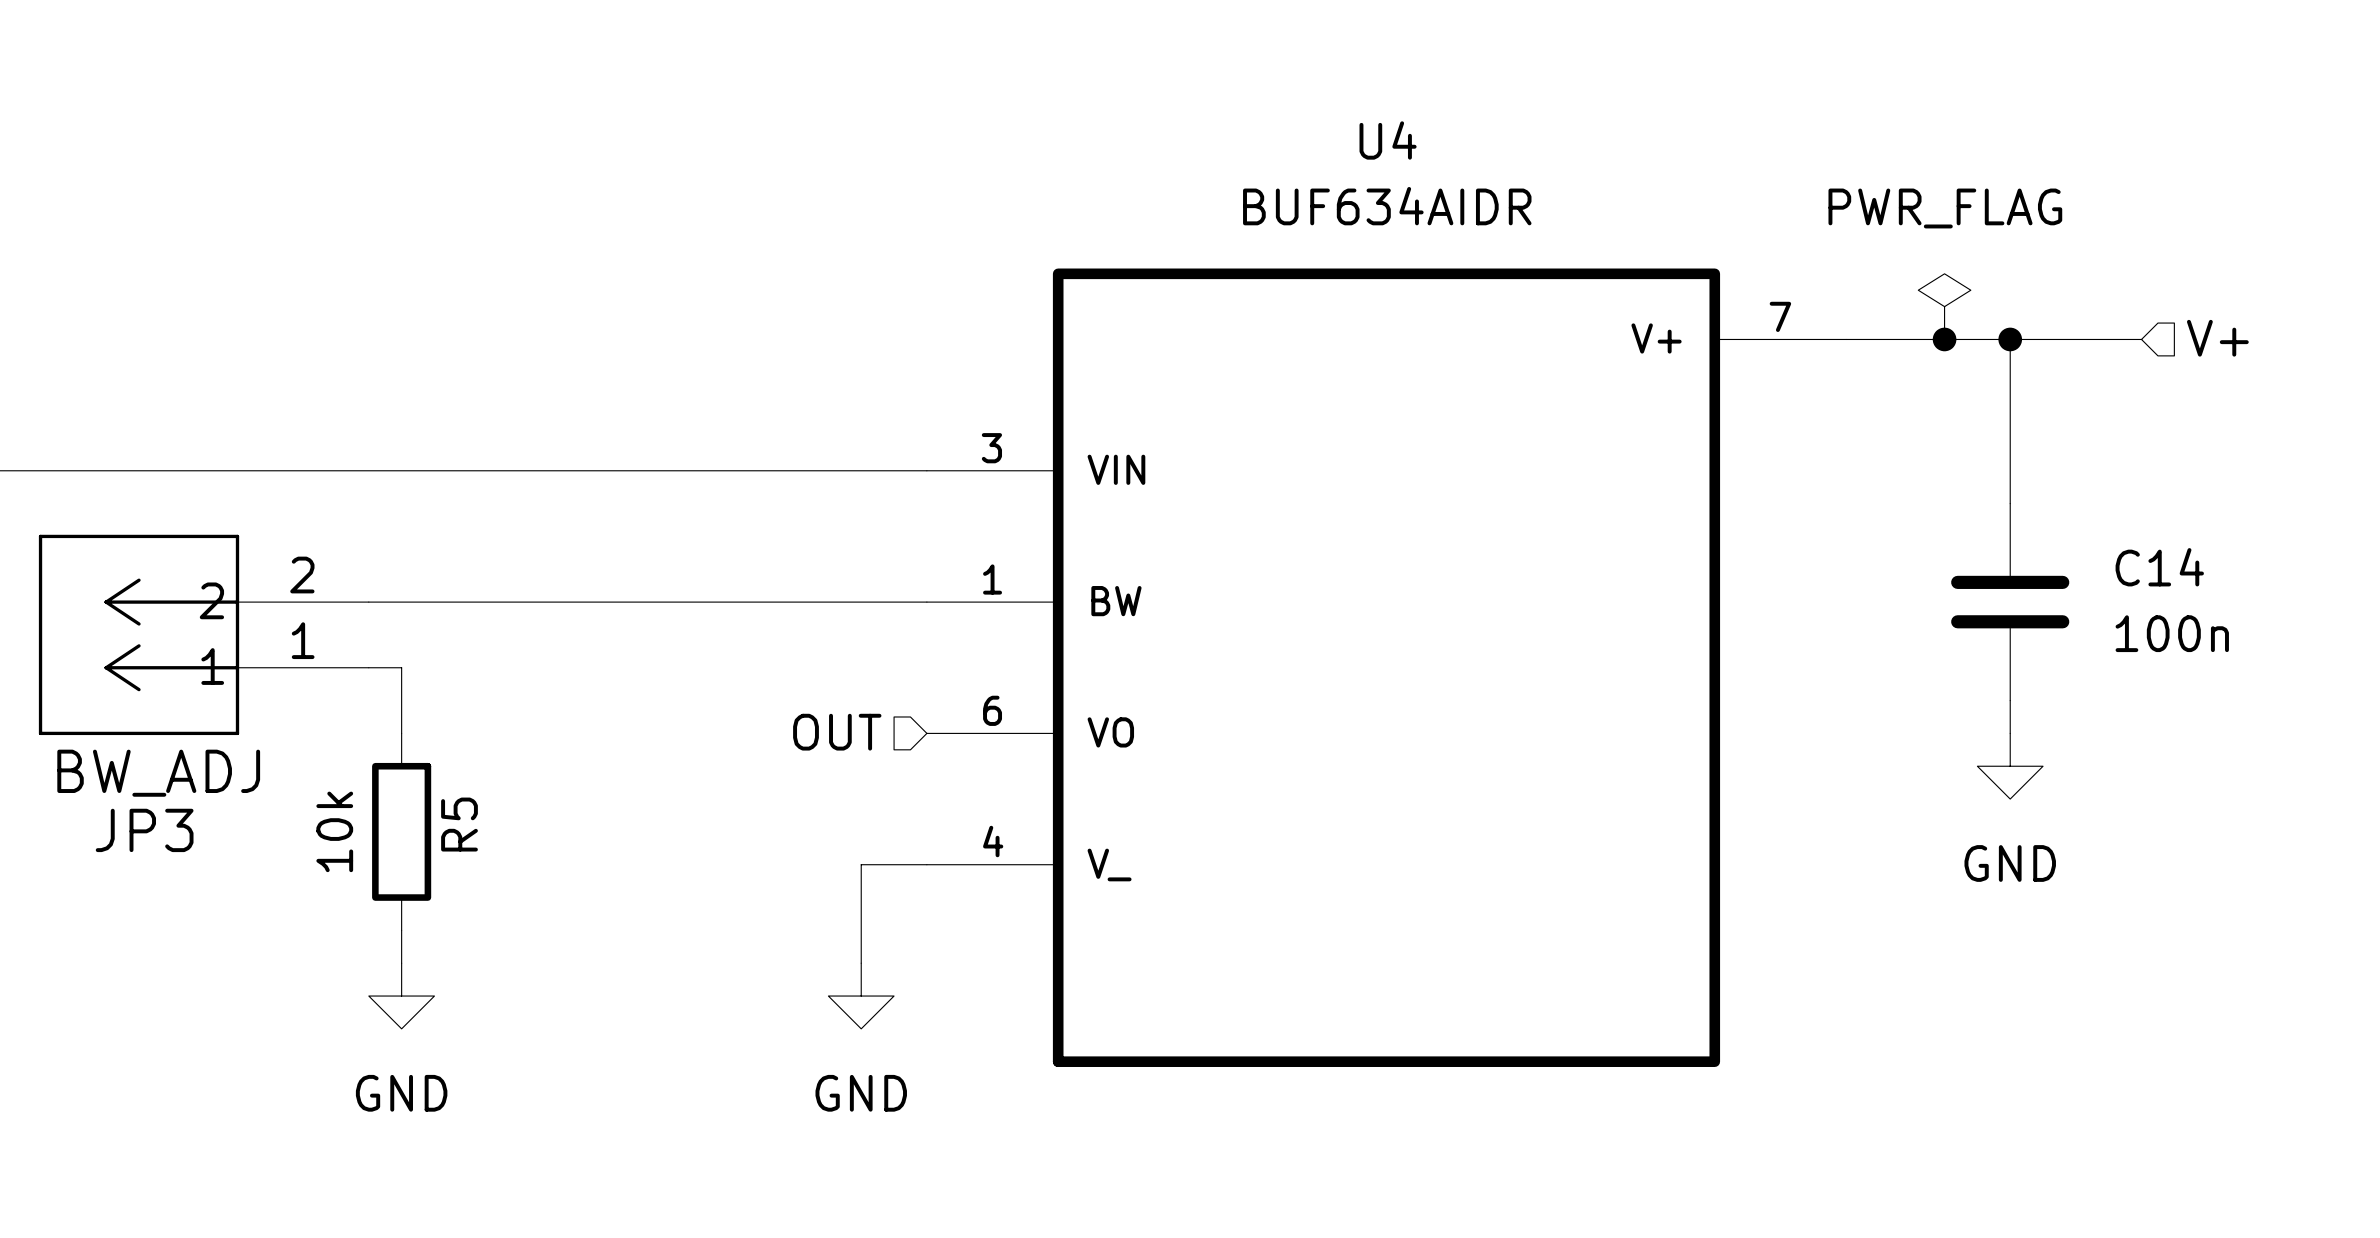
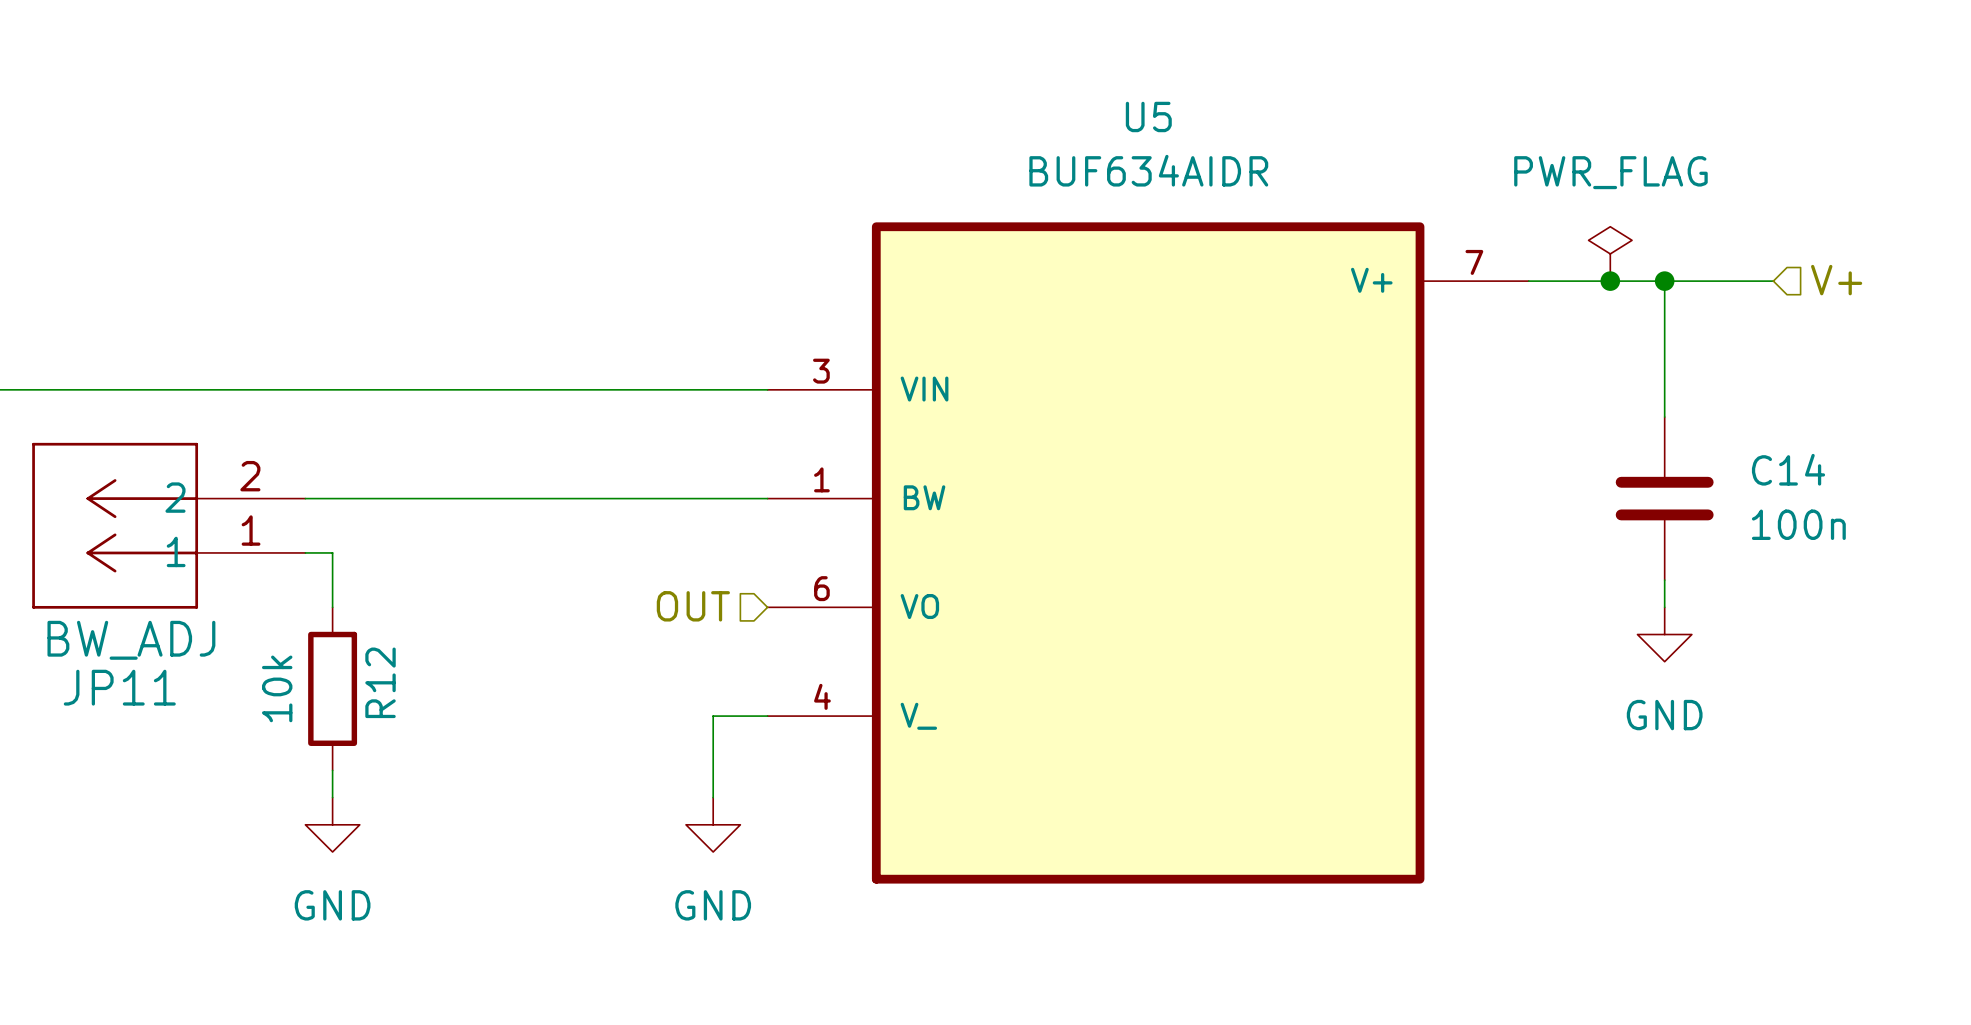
U4 name: U4 (1388, 140) -> U5 (1148, 116)
R5 name: R5 (459, 824) -> R12 (380, 682)
JP3 name: JP3 (144, 830) -> JP11 (119, 687)

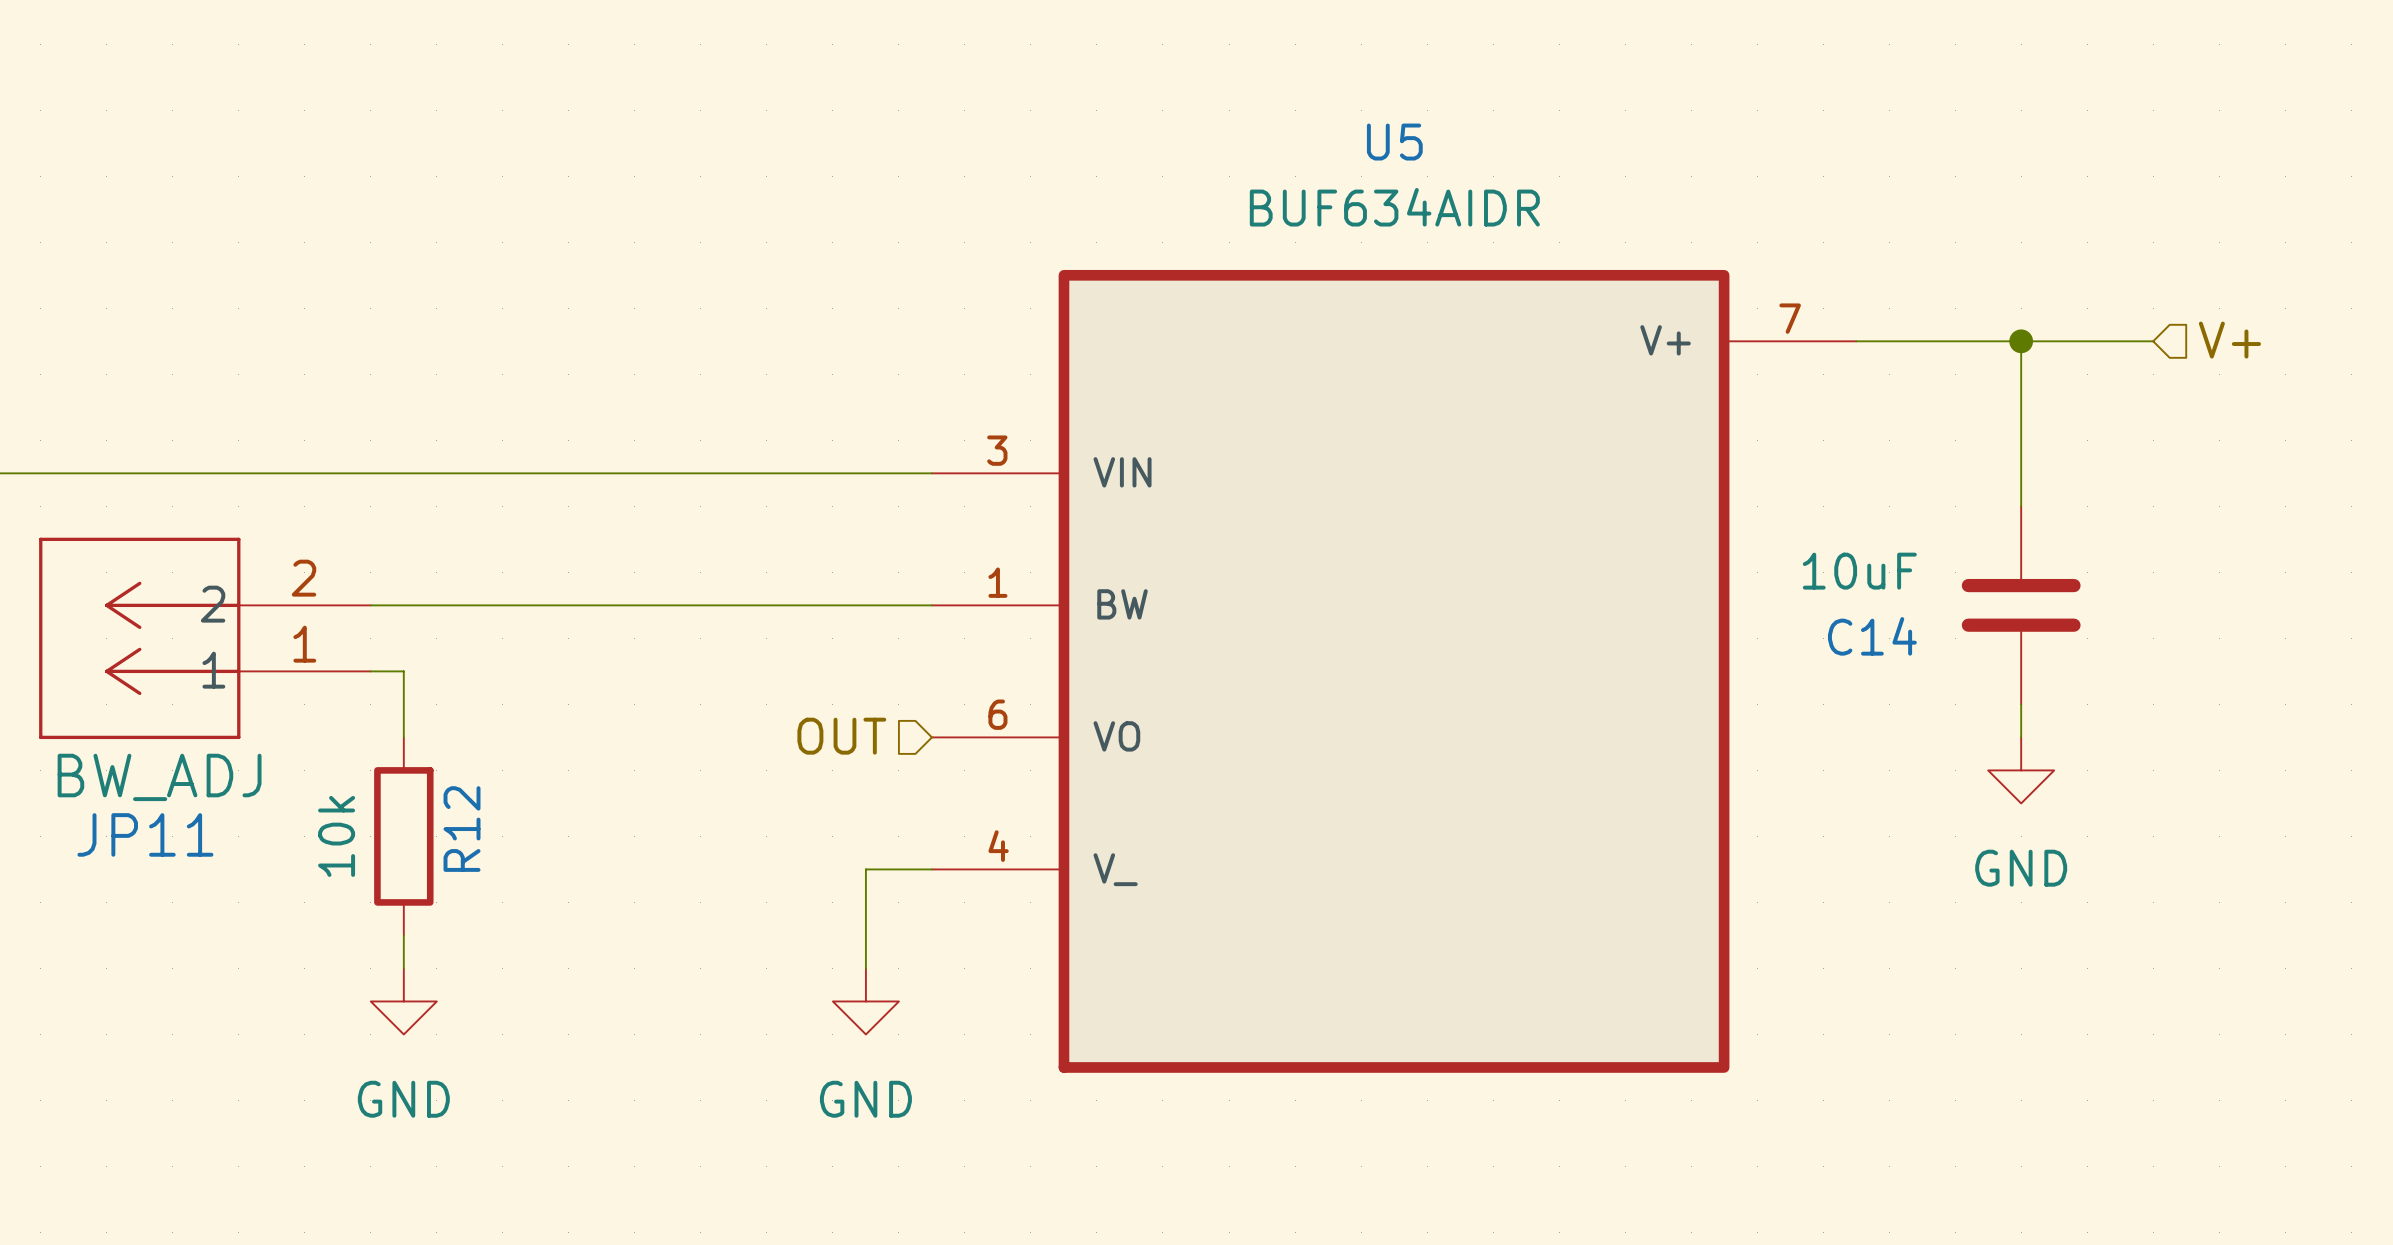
power symbol: PWR_FLAG (1610, 253) -> none
junction: (1610, 281) -> none
C14 name position: C14 (1788, 469) -> C14 (1872, 636)
C14 value: 100n (1798, 524) -> 10uF (1859, 571)

